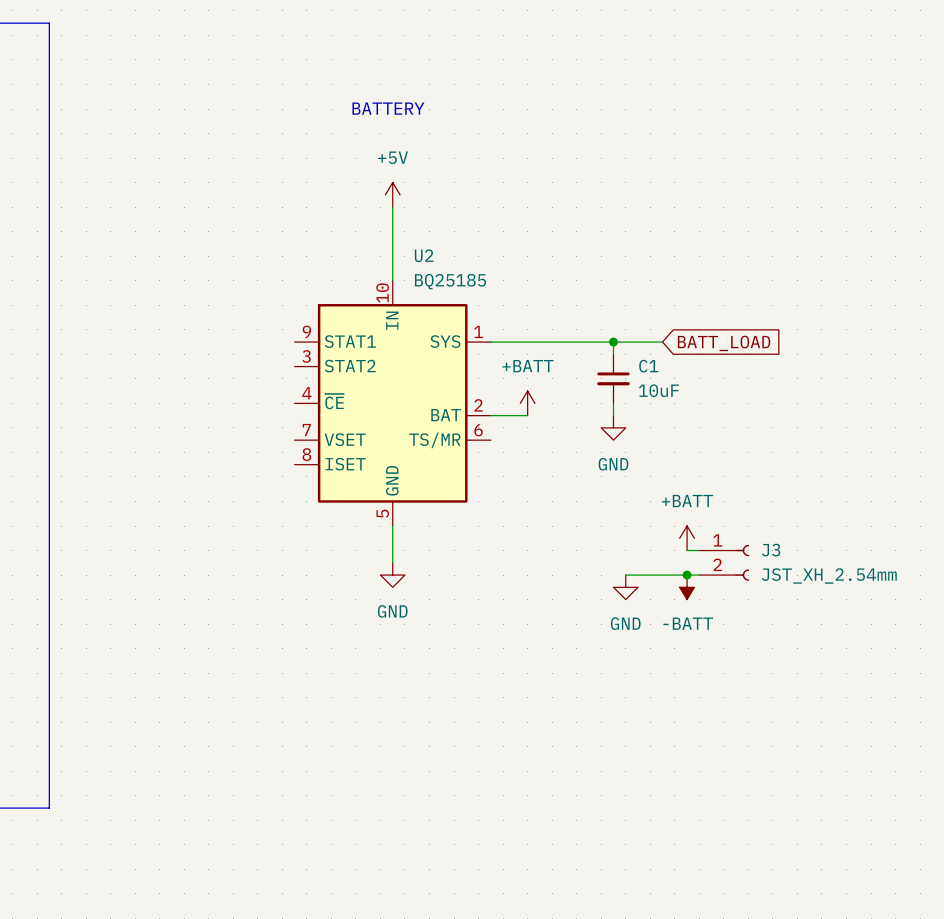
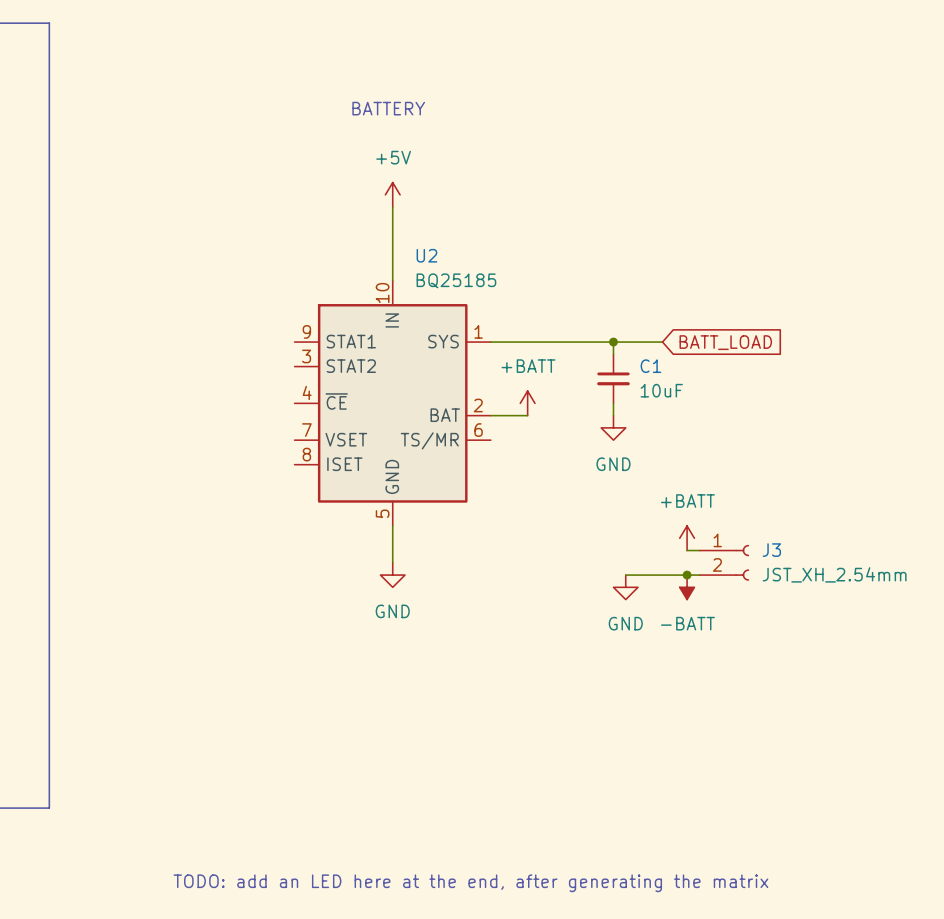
text: none -> TODO: add an LED here at the end, after generating the matrix (470, 883)

